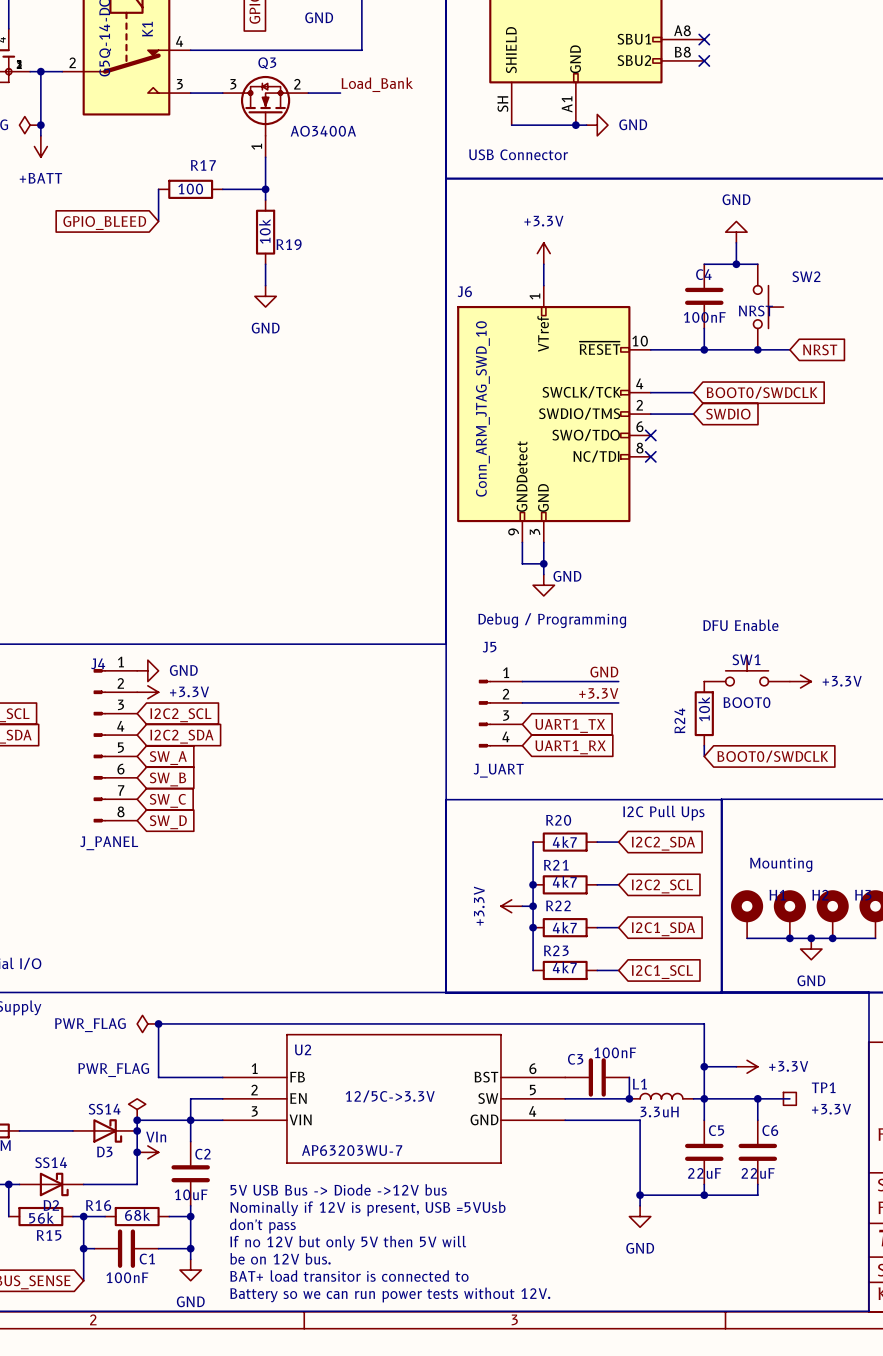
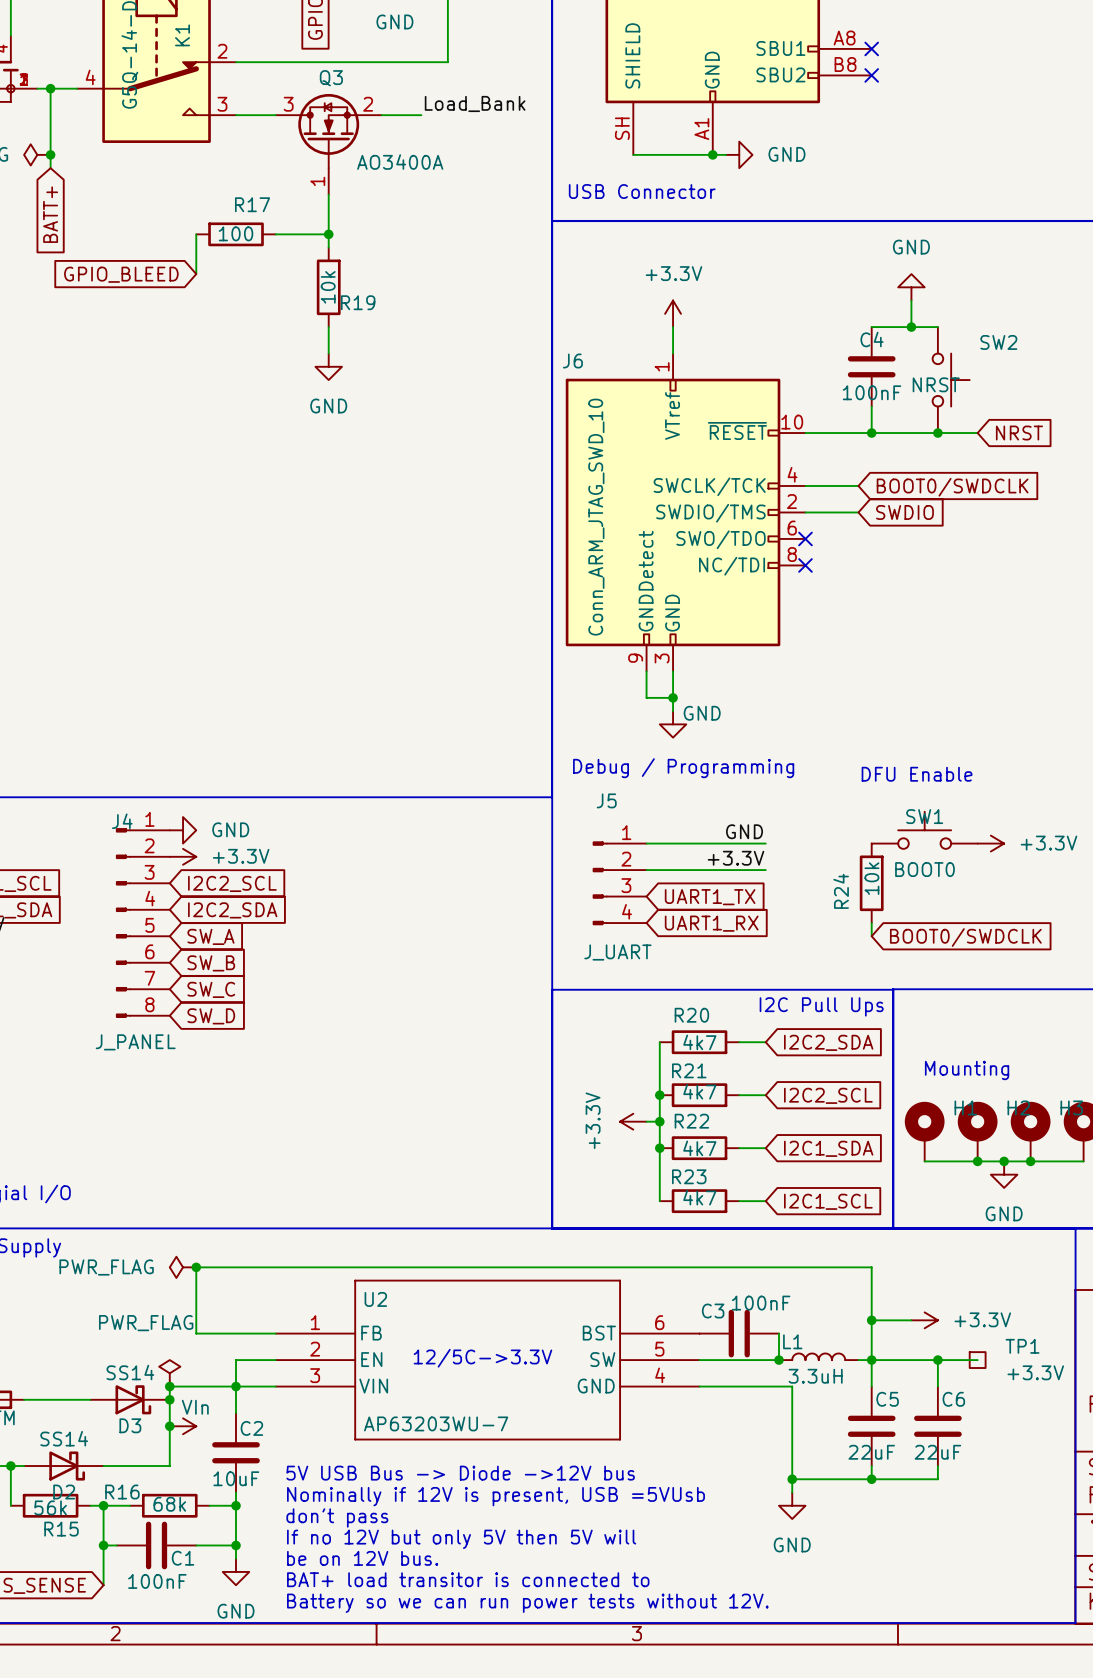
K1 pin number: 4 (179, 41) -> 2 (222, 51)
K1 pin number: 2 (72, 62) -> 4 (90, 77)
power symbol: +BATT (40, 146) -> none
global label: none -> BATT+ (50, 214)

